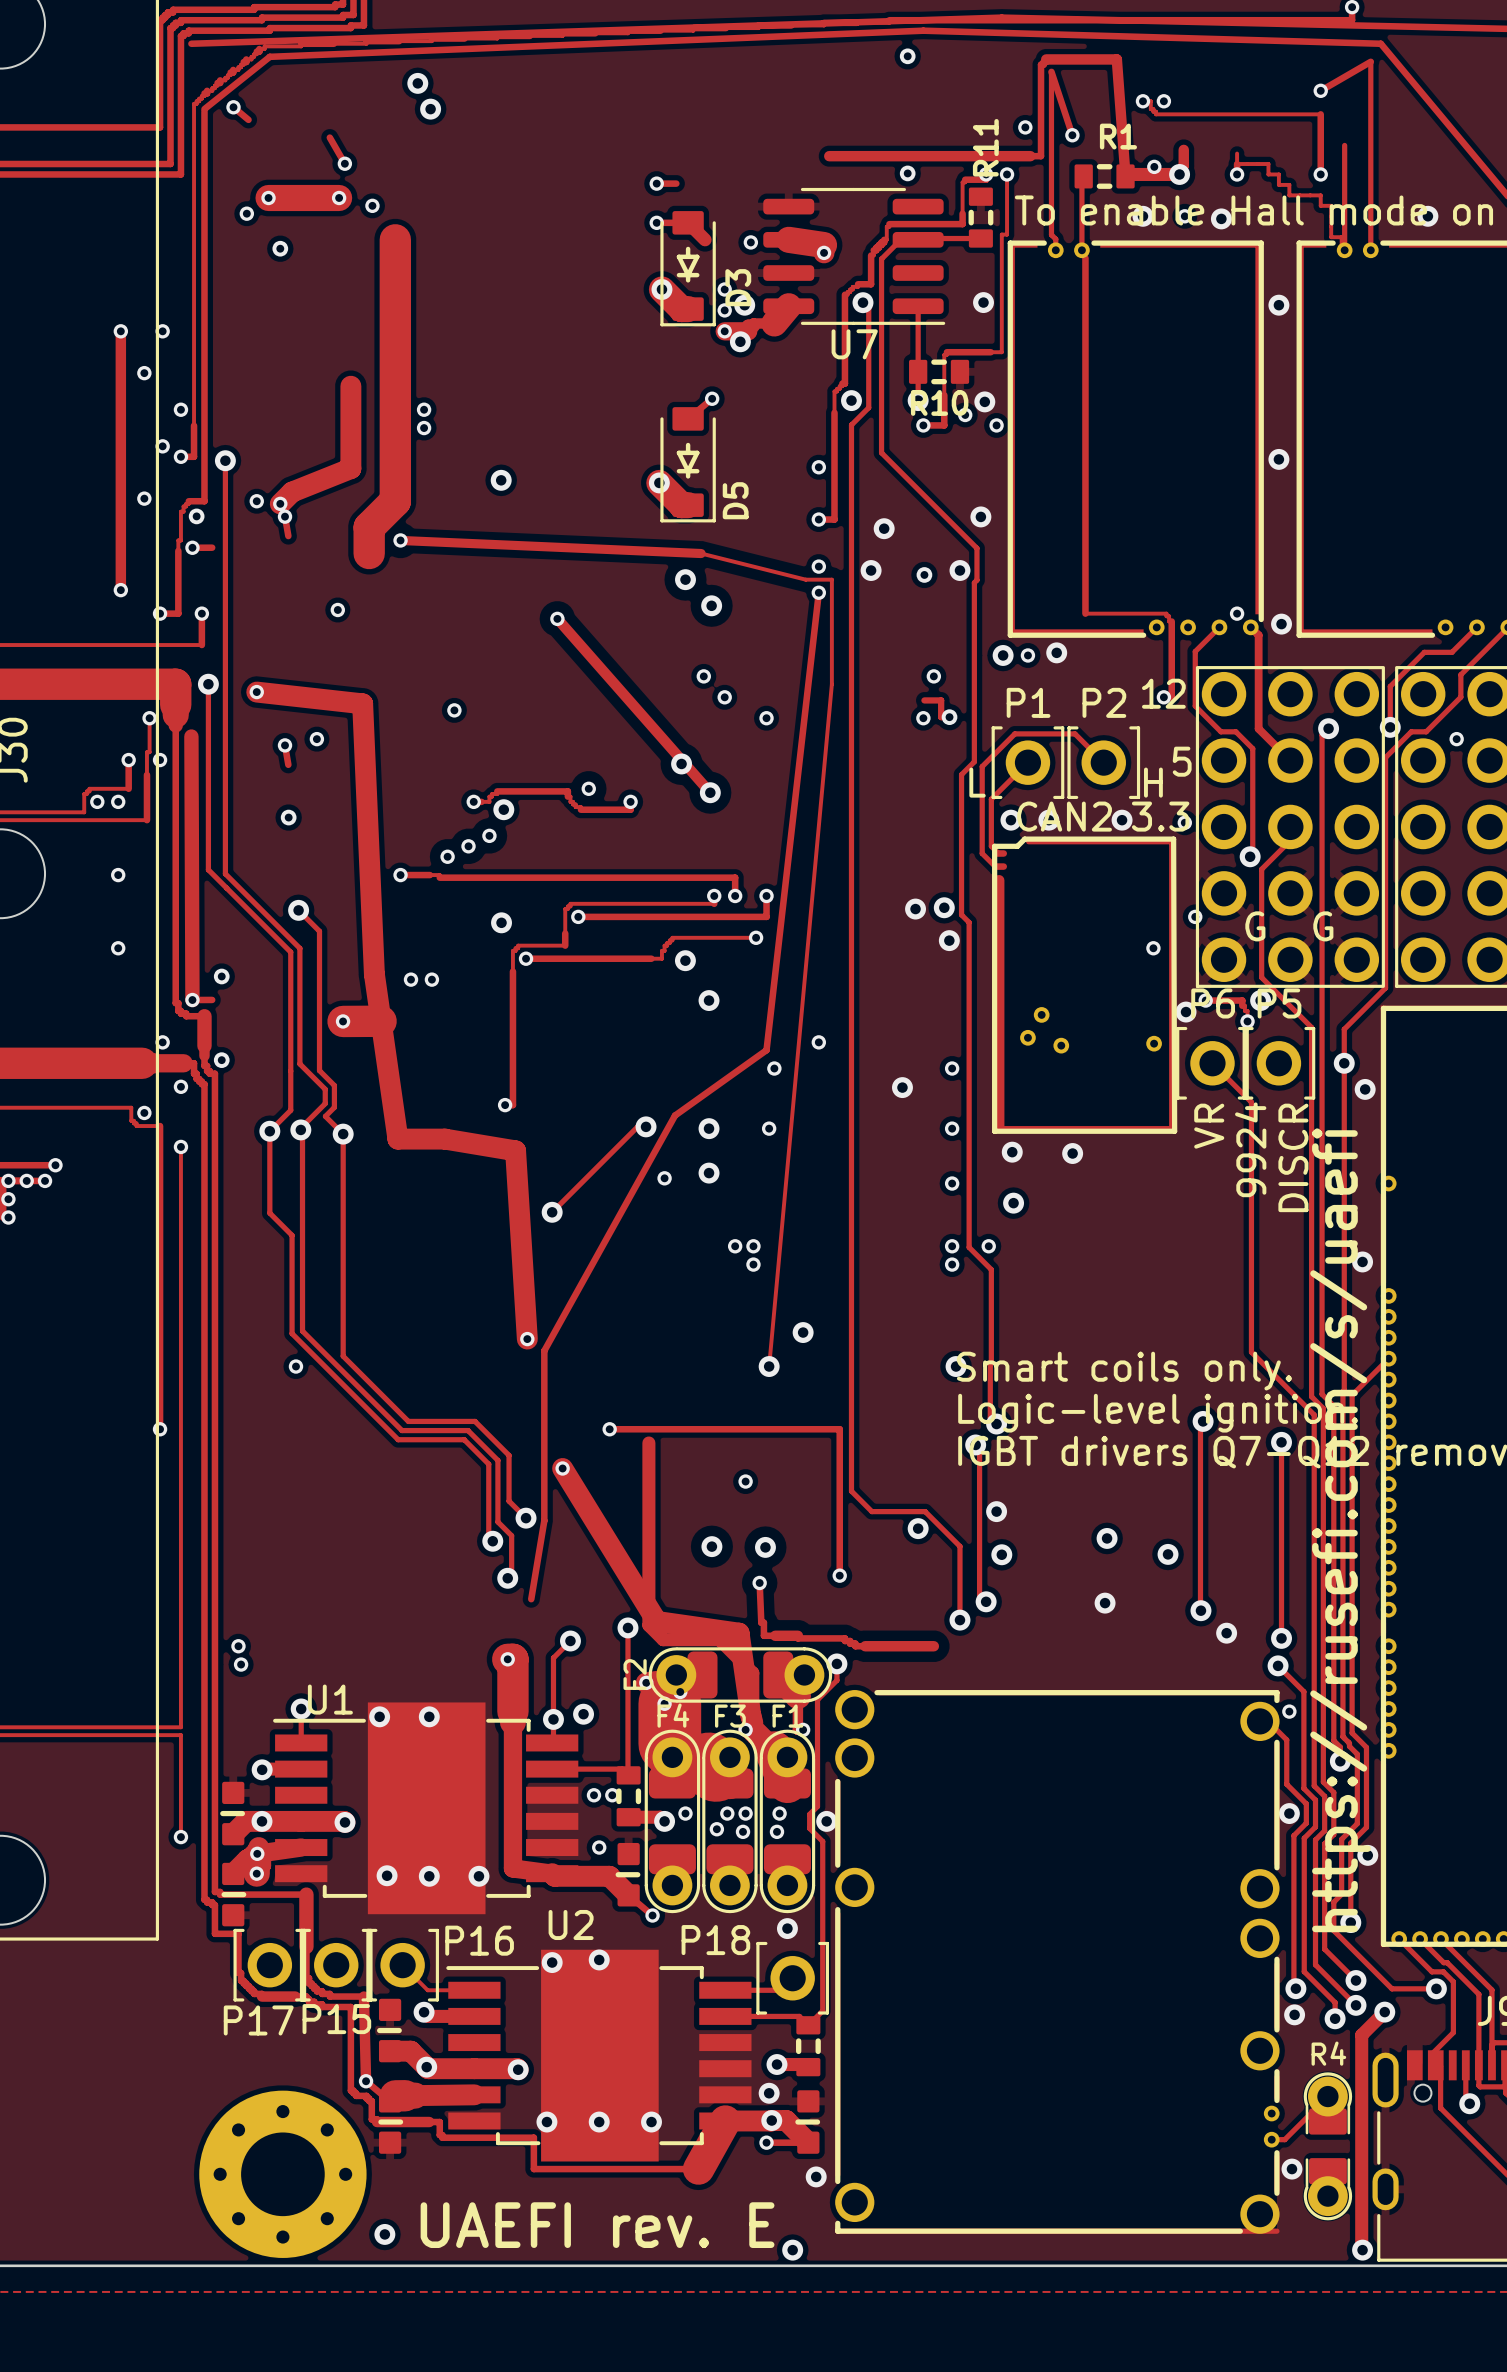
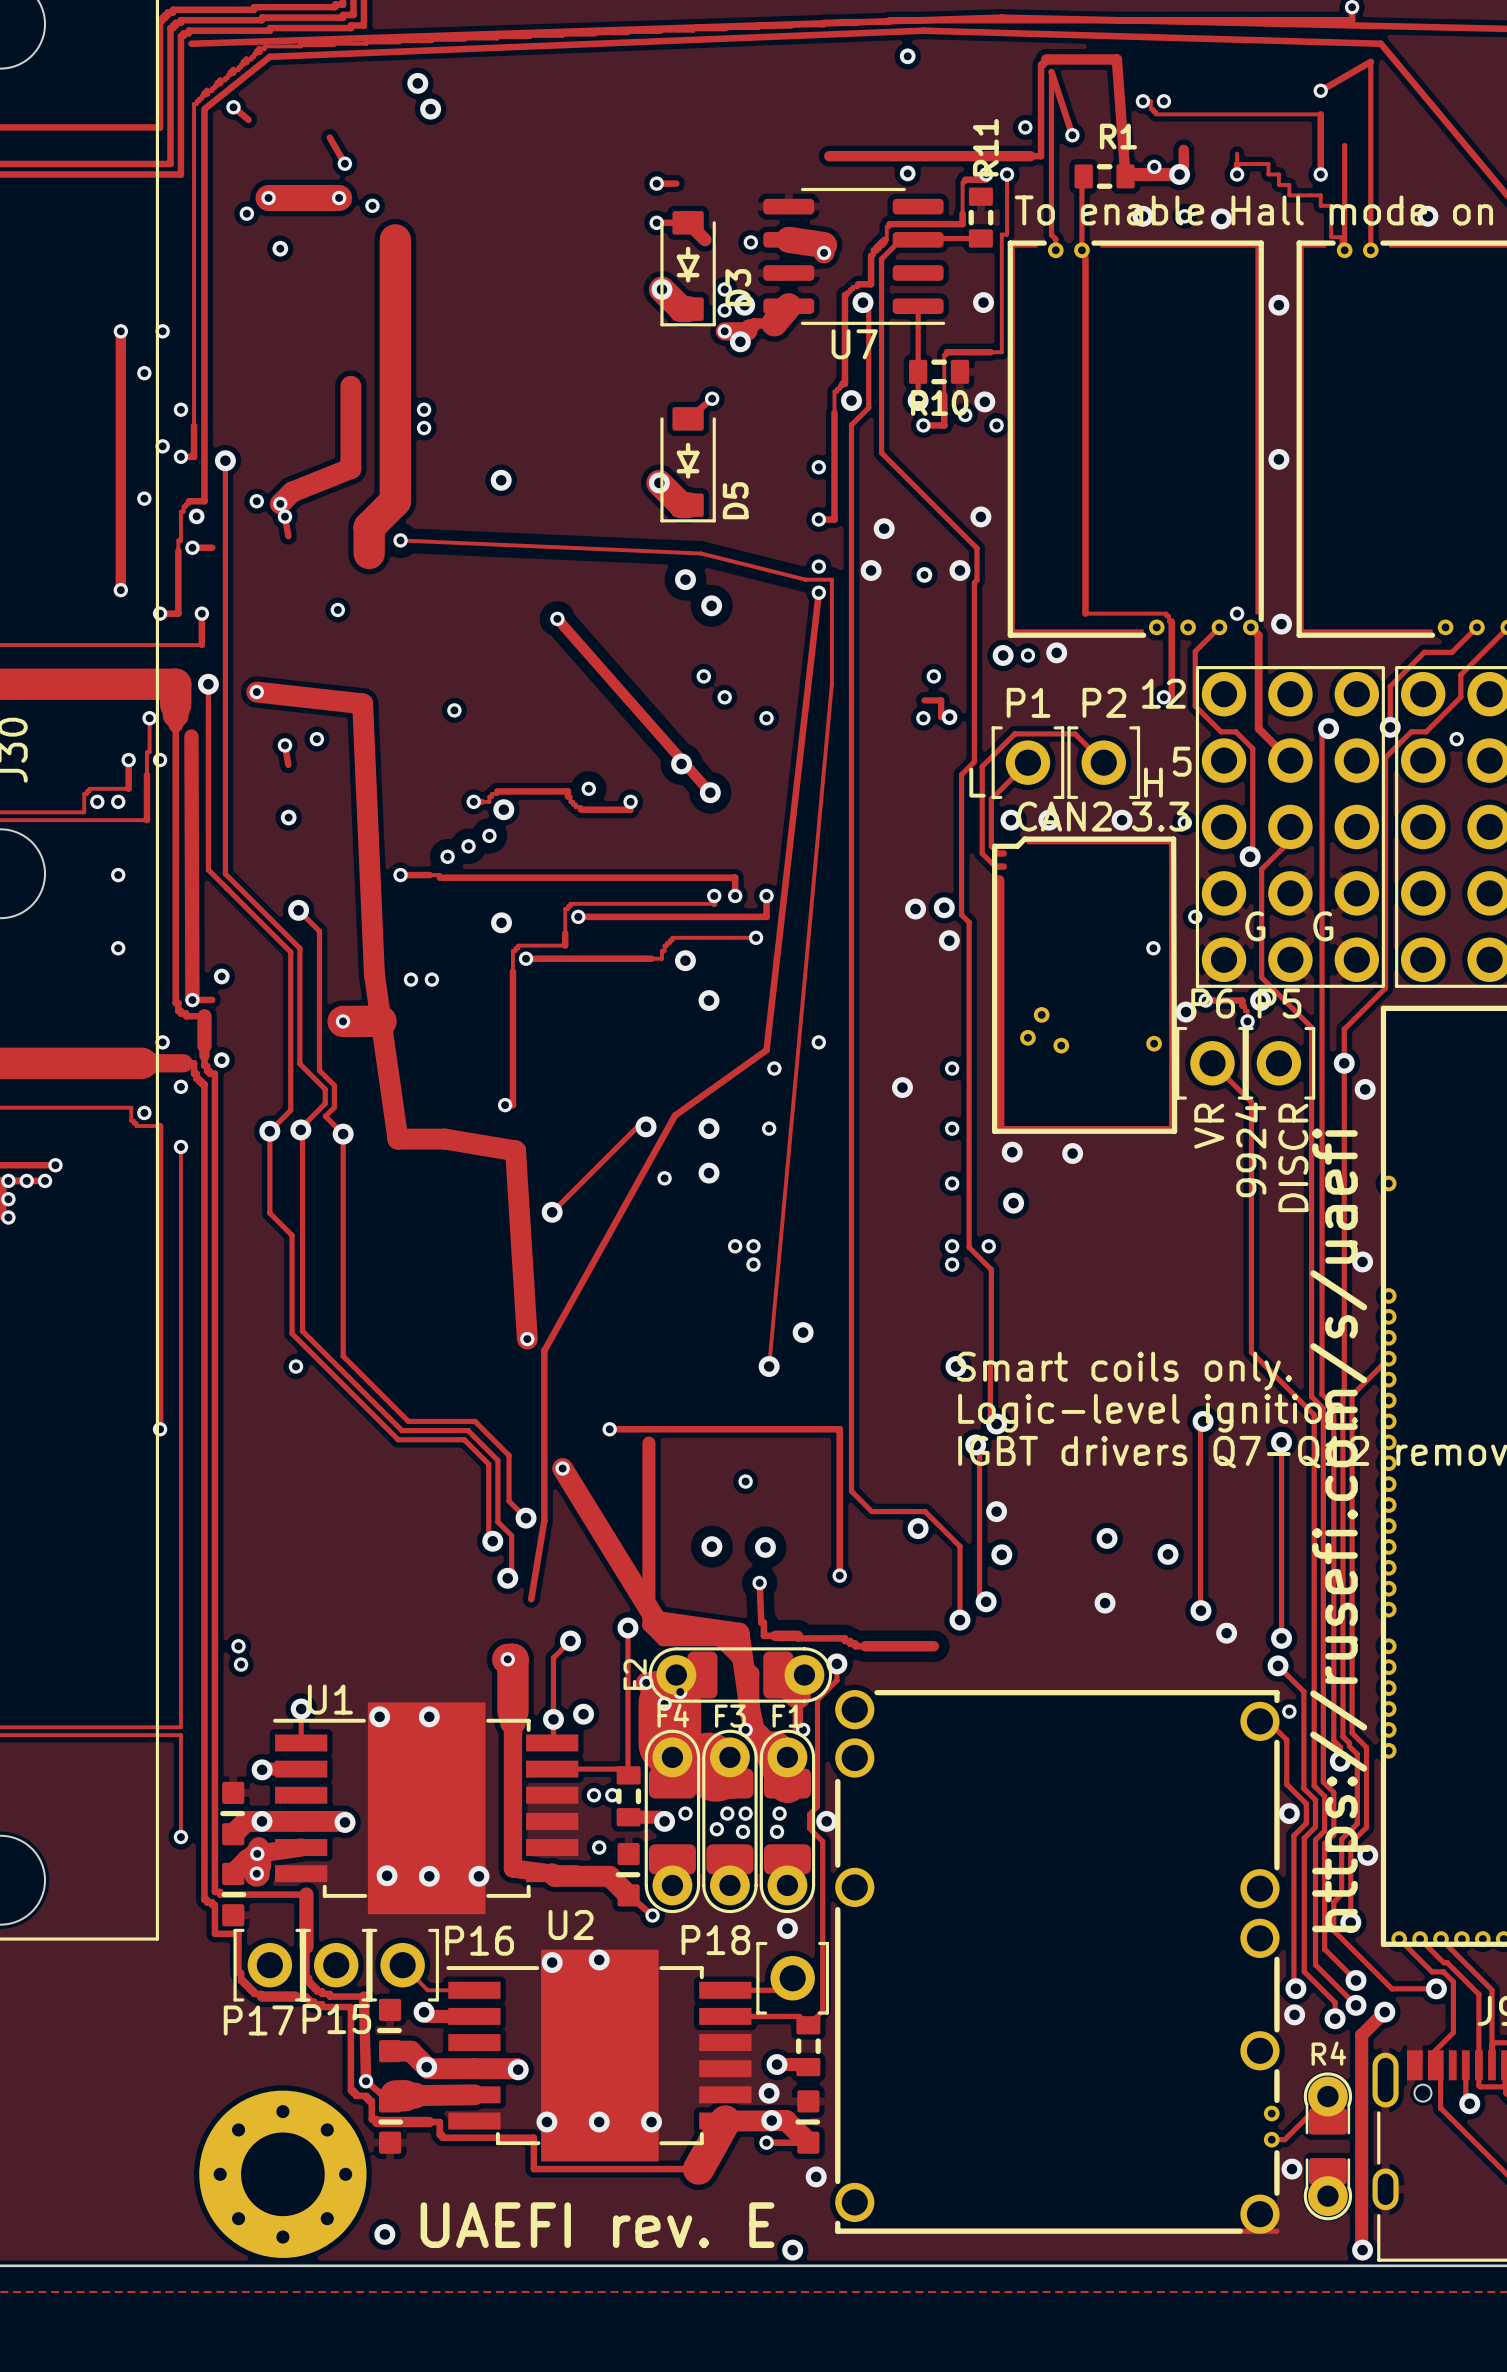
track width: thick (400, 540) (701, 553) -> thin (400, 540) (701, 553)

